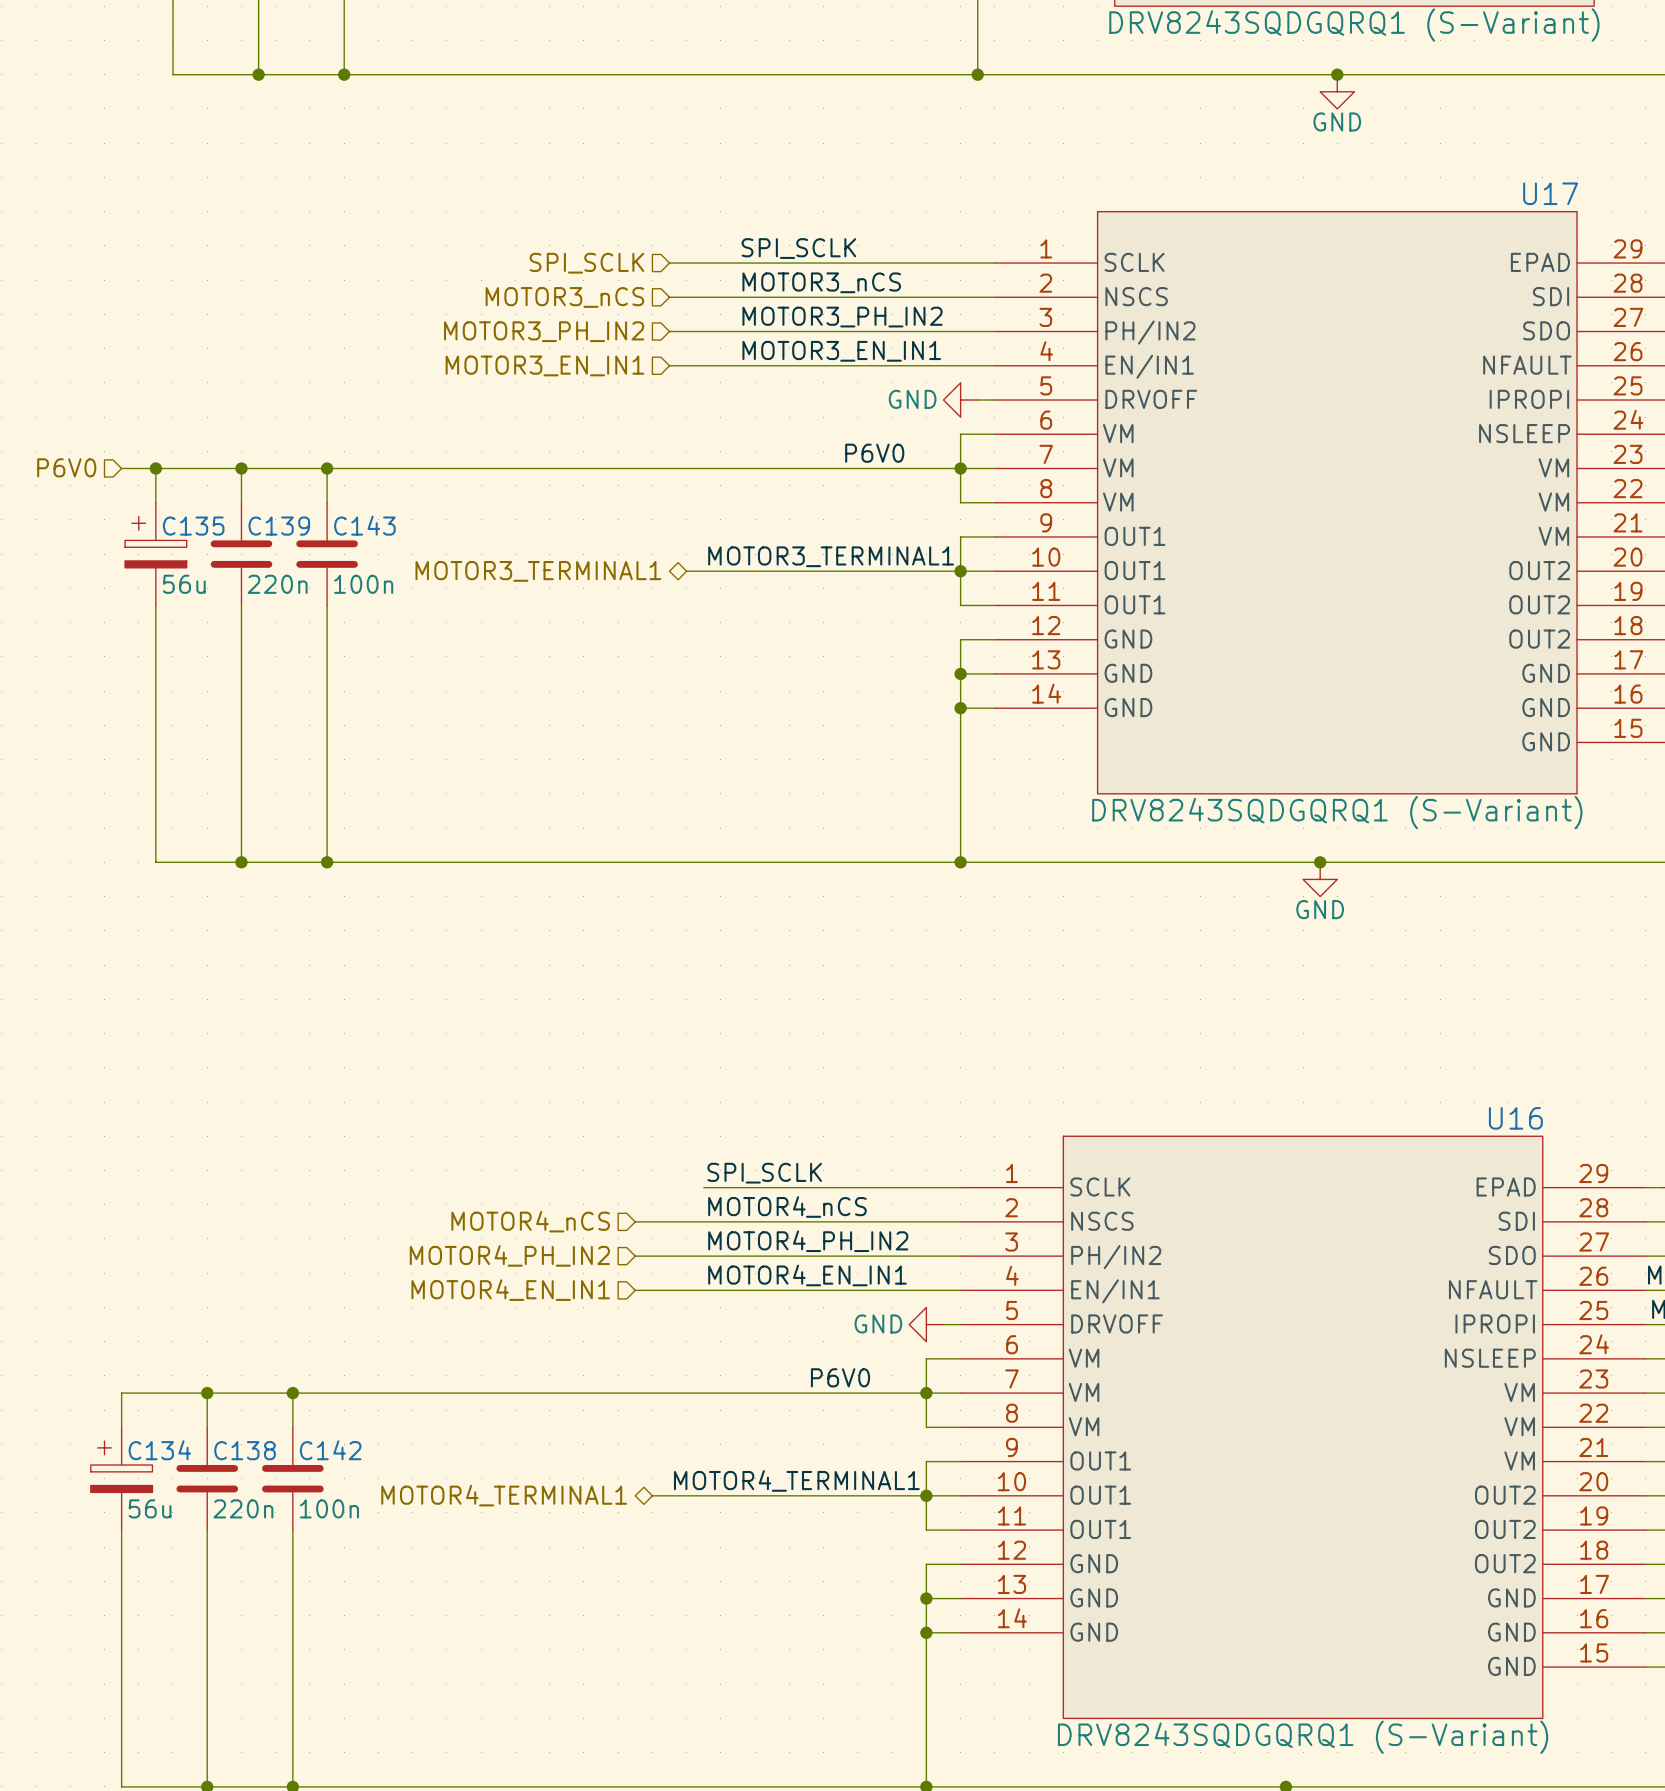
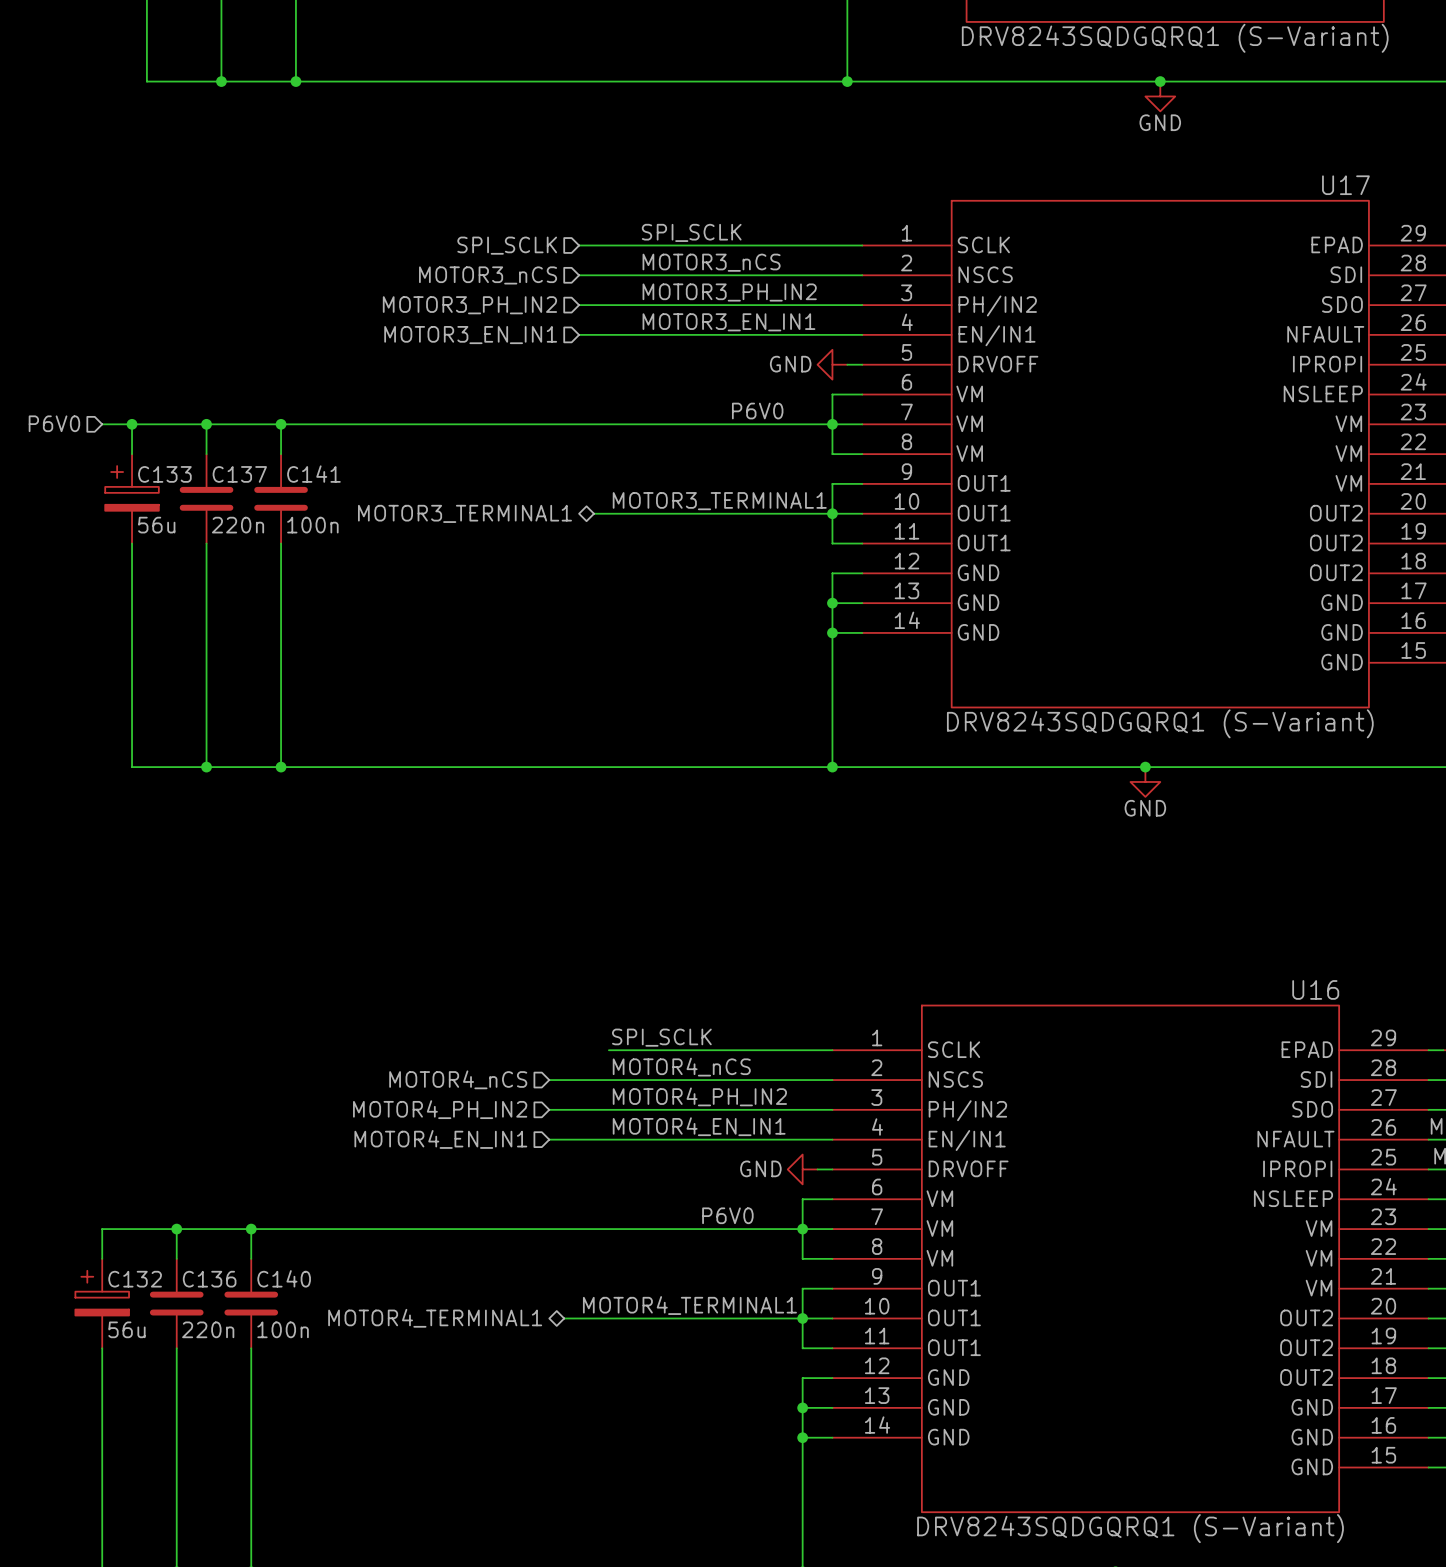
C143 name: C143 (364, 525) -> C141 (313, 474)
C135 name: C135 (193, 526) -> C133 (164, 474)
C139 name: C139 (279, 526) -> C137 (239, 474)
C134 name: C134 (159, 1450) -> C132 (135, 1279)
C138 name: C138 (245, 1450) -> C136 (209, 1279)
C142 name: C142 (330, 1450) -> C140 (284, 1278)

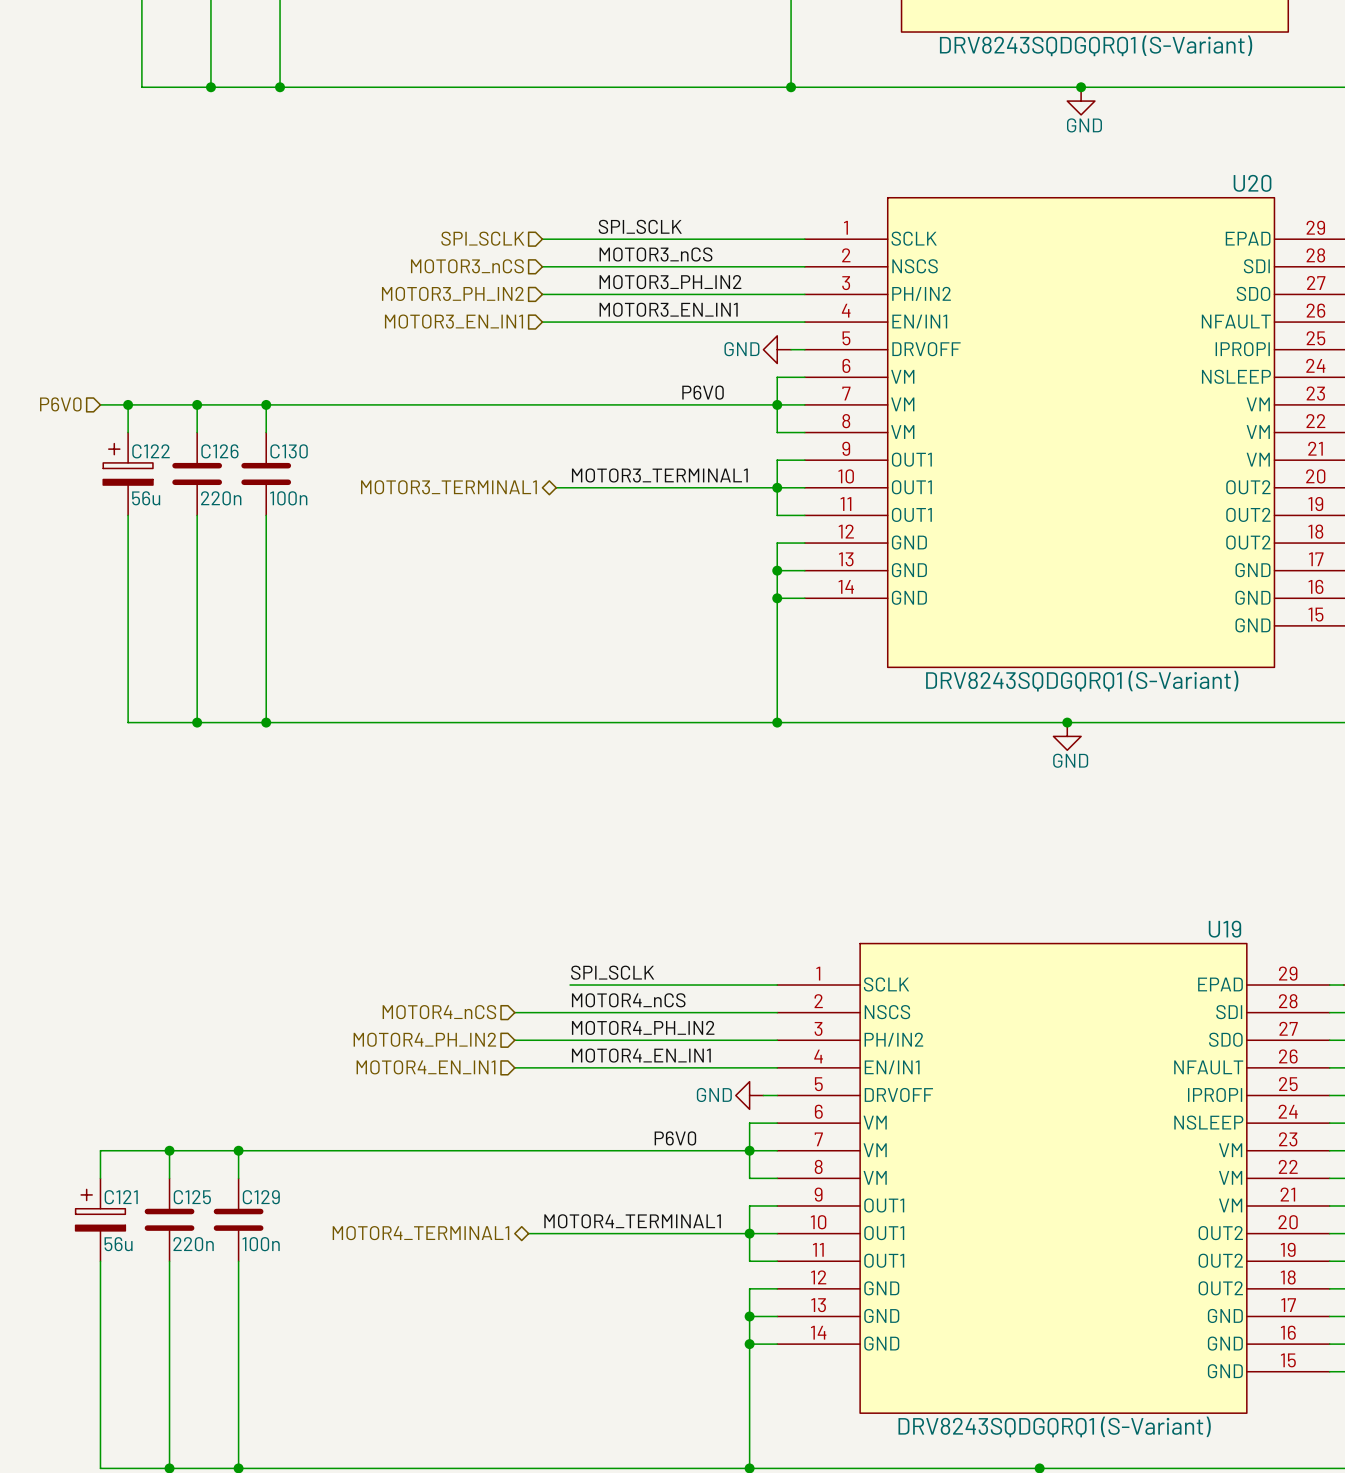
U17 name: U17 (1345, 185) -> U20 (1252, 183)
C133 name: C133 (164, 474) -> C122 (151, 451)
C137 name: C137 (239, 474) -> C126 (219, 451)
C141 name: C141 (313, 474) -> C130 (289, 451)
U16 name: U16 (1315, 989) -> U19 (1224, 929)
C140 name: C140 (284, 1278) -> C129 (261, 1197)
C132 name: C132 (135, 1279) -> C121 (121, 1197)
C136 name: C136 (209, 1279) -> C125 (192, 1197)

